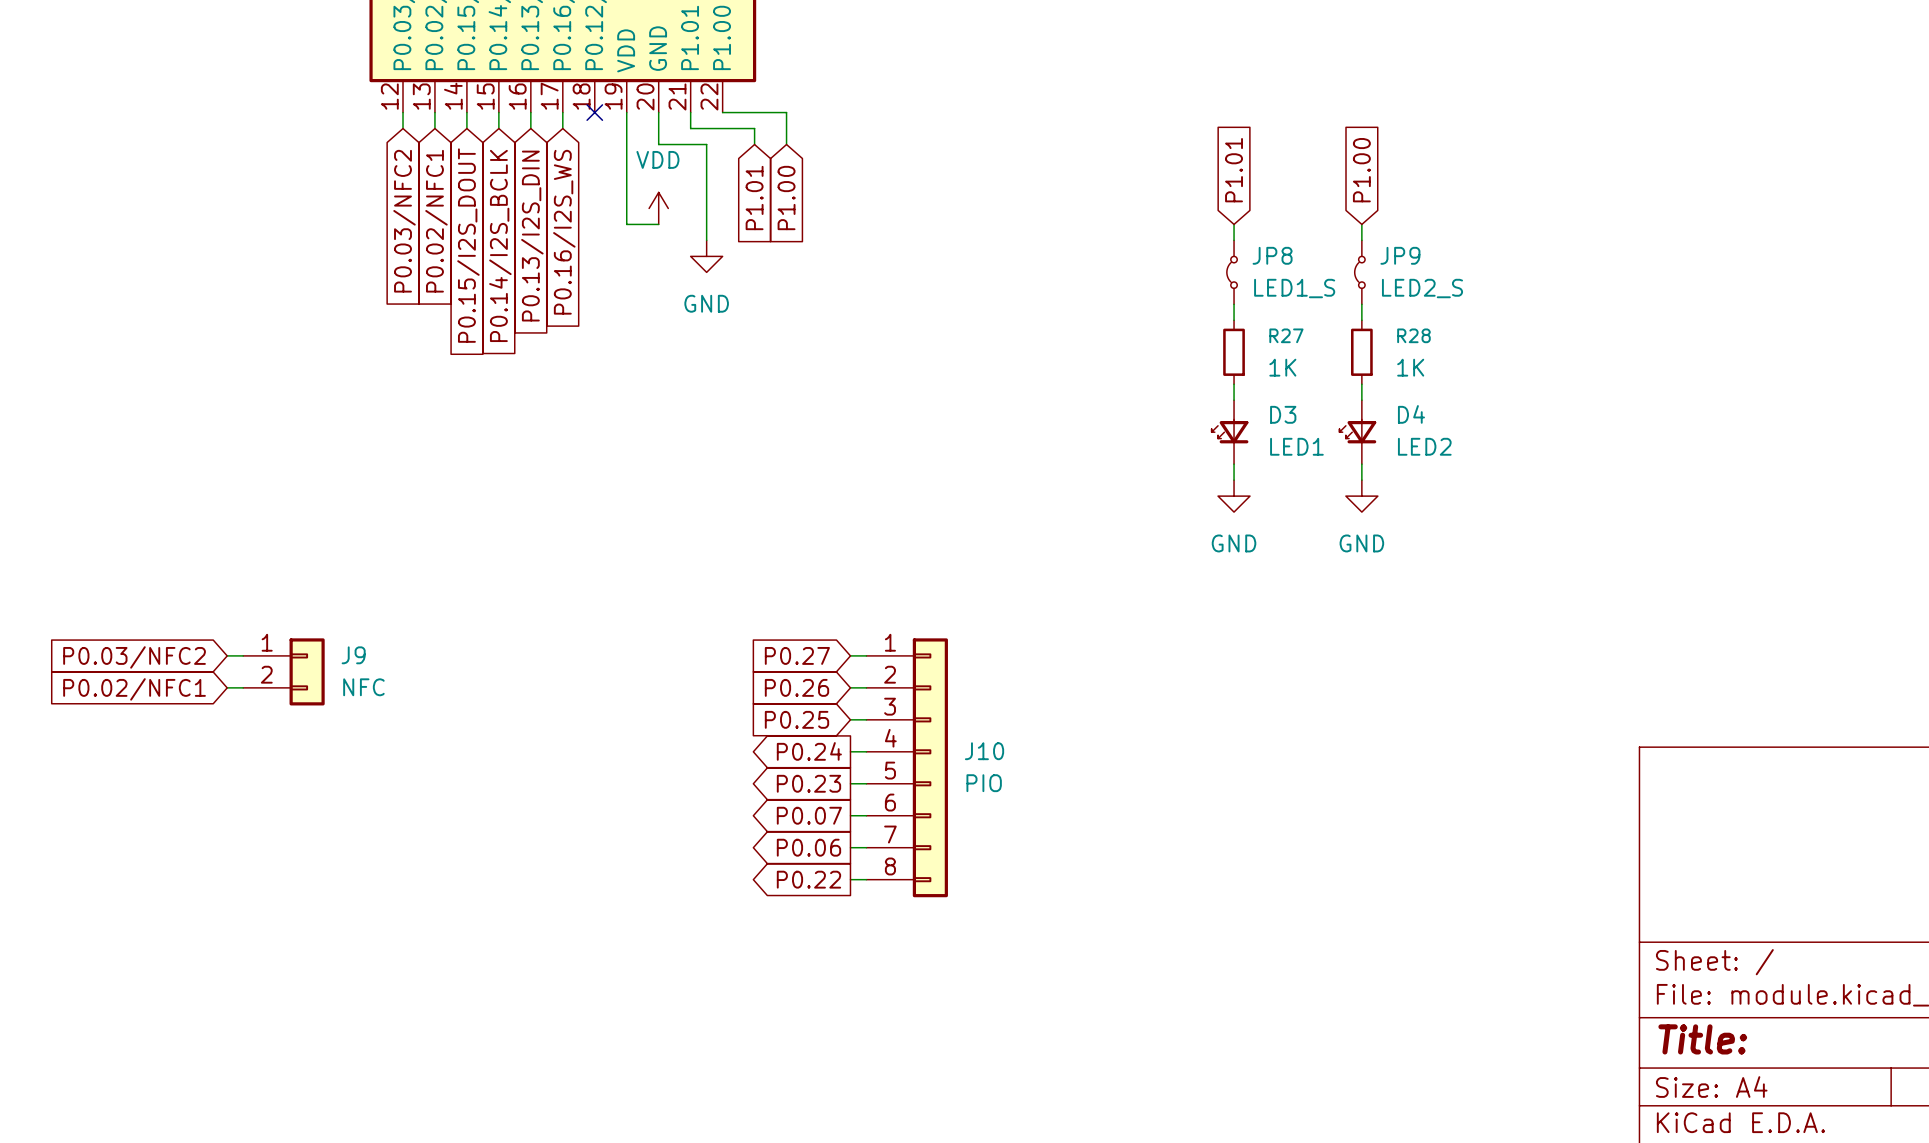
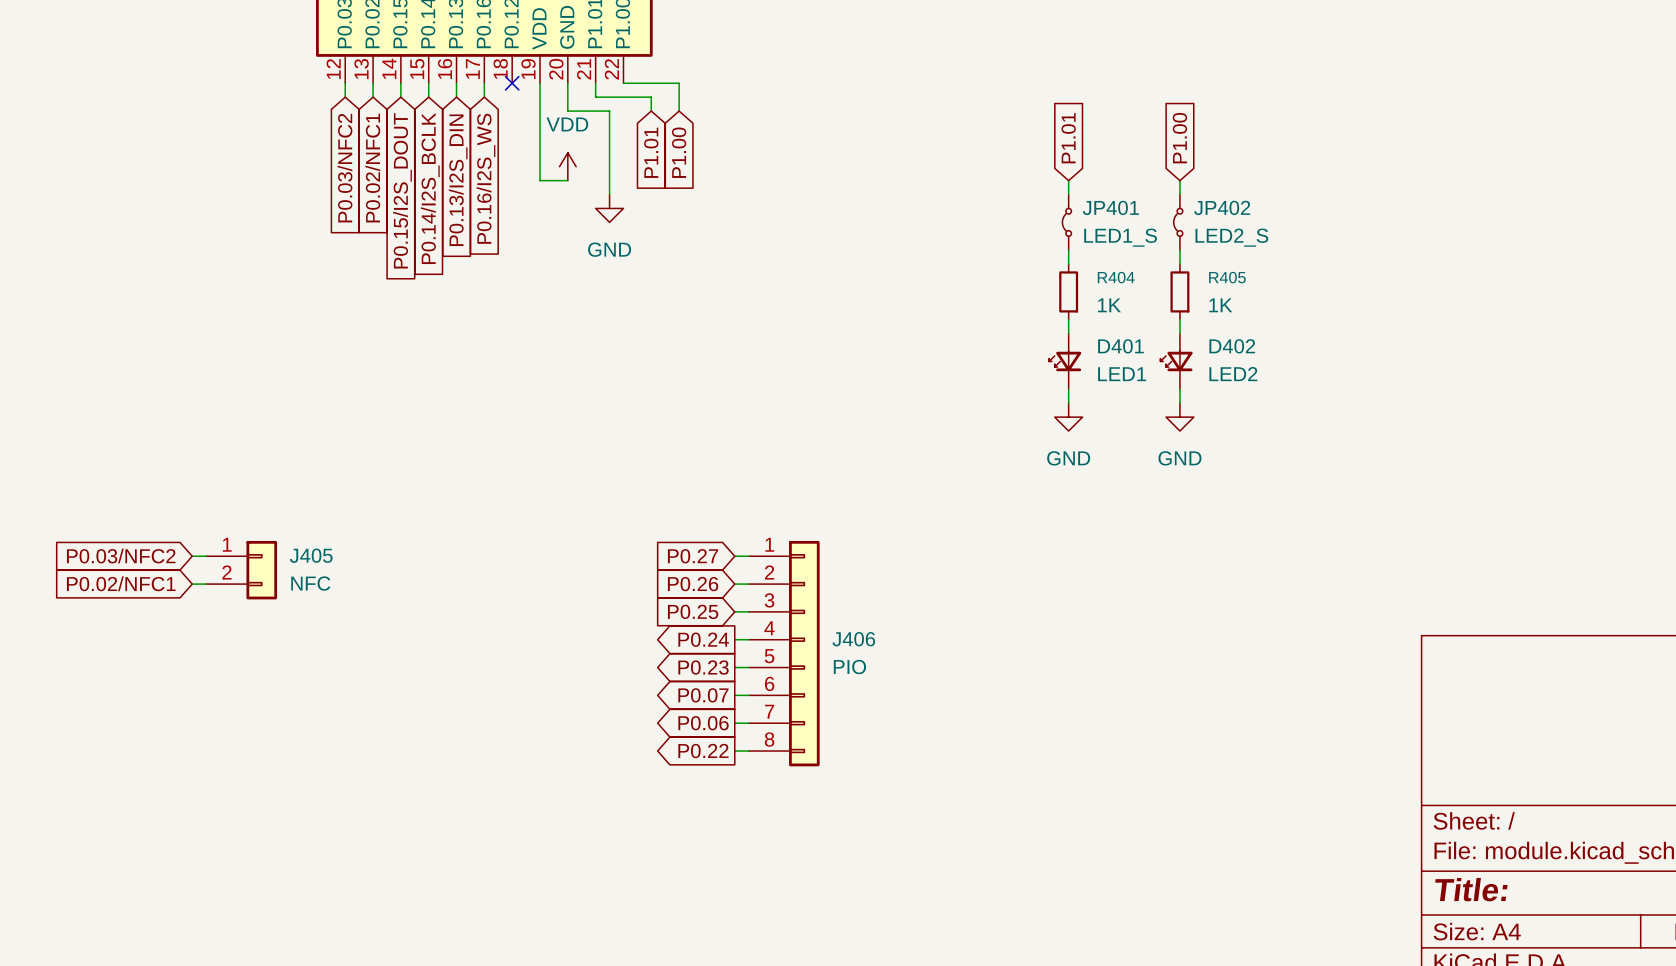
JP8 name: JP8 (1272, 255) -> JP401 (1110, 207)
JP9 name: JP9 (1400, 255) -> JP402 (1222, 207)
R27 name: R27 (1286, 335) -> R404 (1116, 277)
R28 name: R28 (1413, 335) -> R405 (1227, 277)
D3 name: D3 (1283, 414) -> D401 (1120, 346)
D4 name: D4 (1411, 414) -> D402 (1232, 346)
J9 name: J9 (353, 655) -> J405 (311, 555)
J10 name: J10 (984, 751) -> J406 (853, 639)

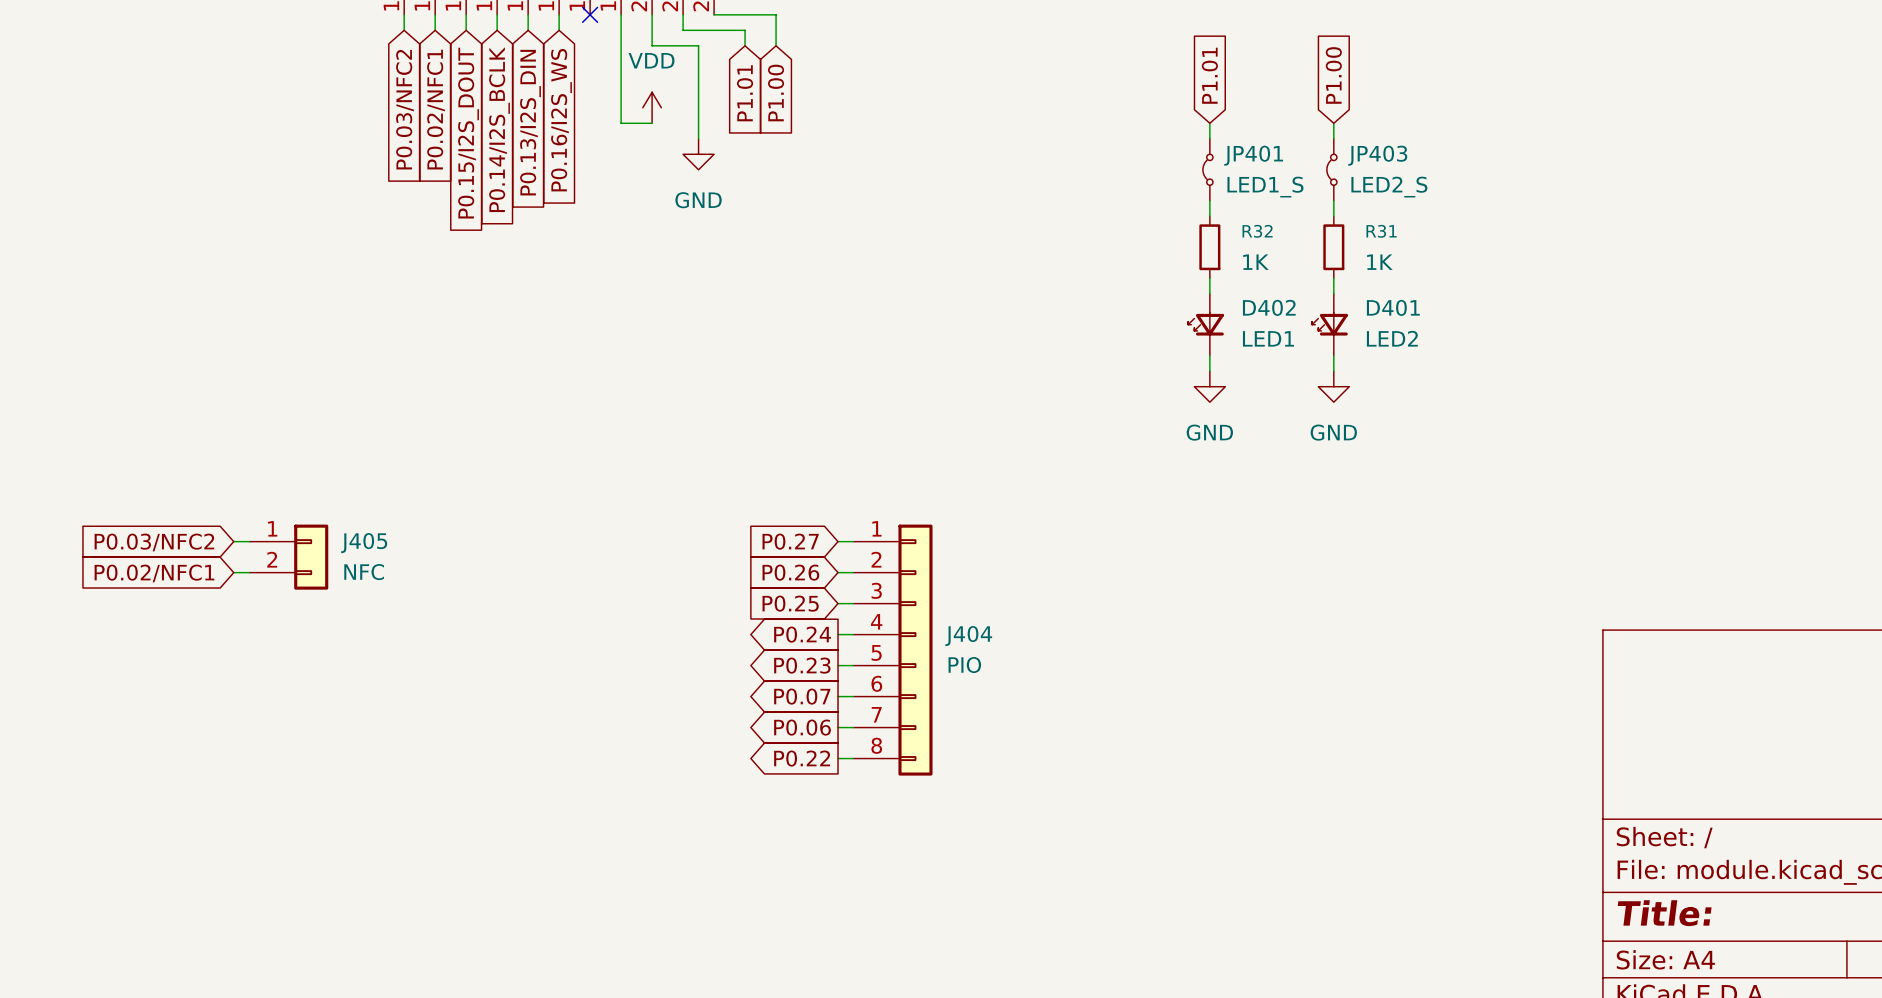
JP402 name: JP402 (1222, 207) -> JP403 (1377, 155)
R404 name: R404 (1116, 277) -> R32 (1257, 231)
R405 name: R405 (1227, 277) -> R31 (1381, 231)
D401 name: D401 (1120, 346) -> D402 (1269, 307)
D402 name: D402 (1232, 346) -> D401 (1393, 307)
J406 name: J406 (853, 639) -> J404 (968, 636)

